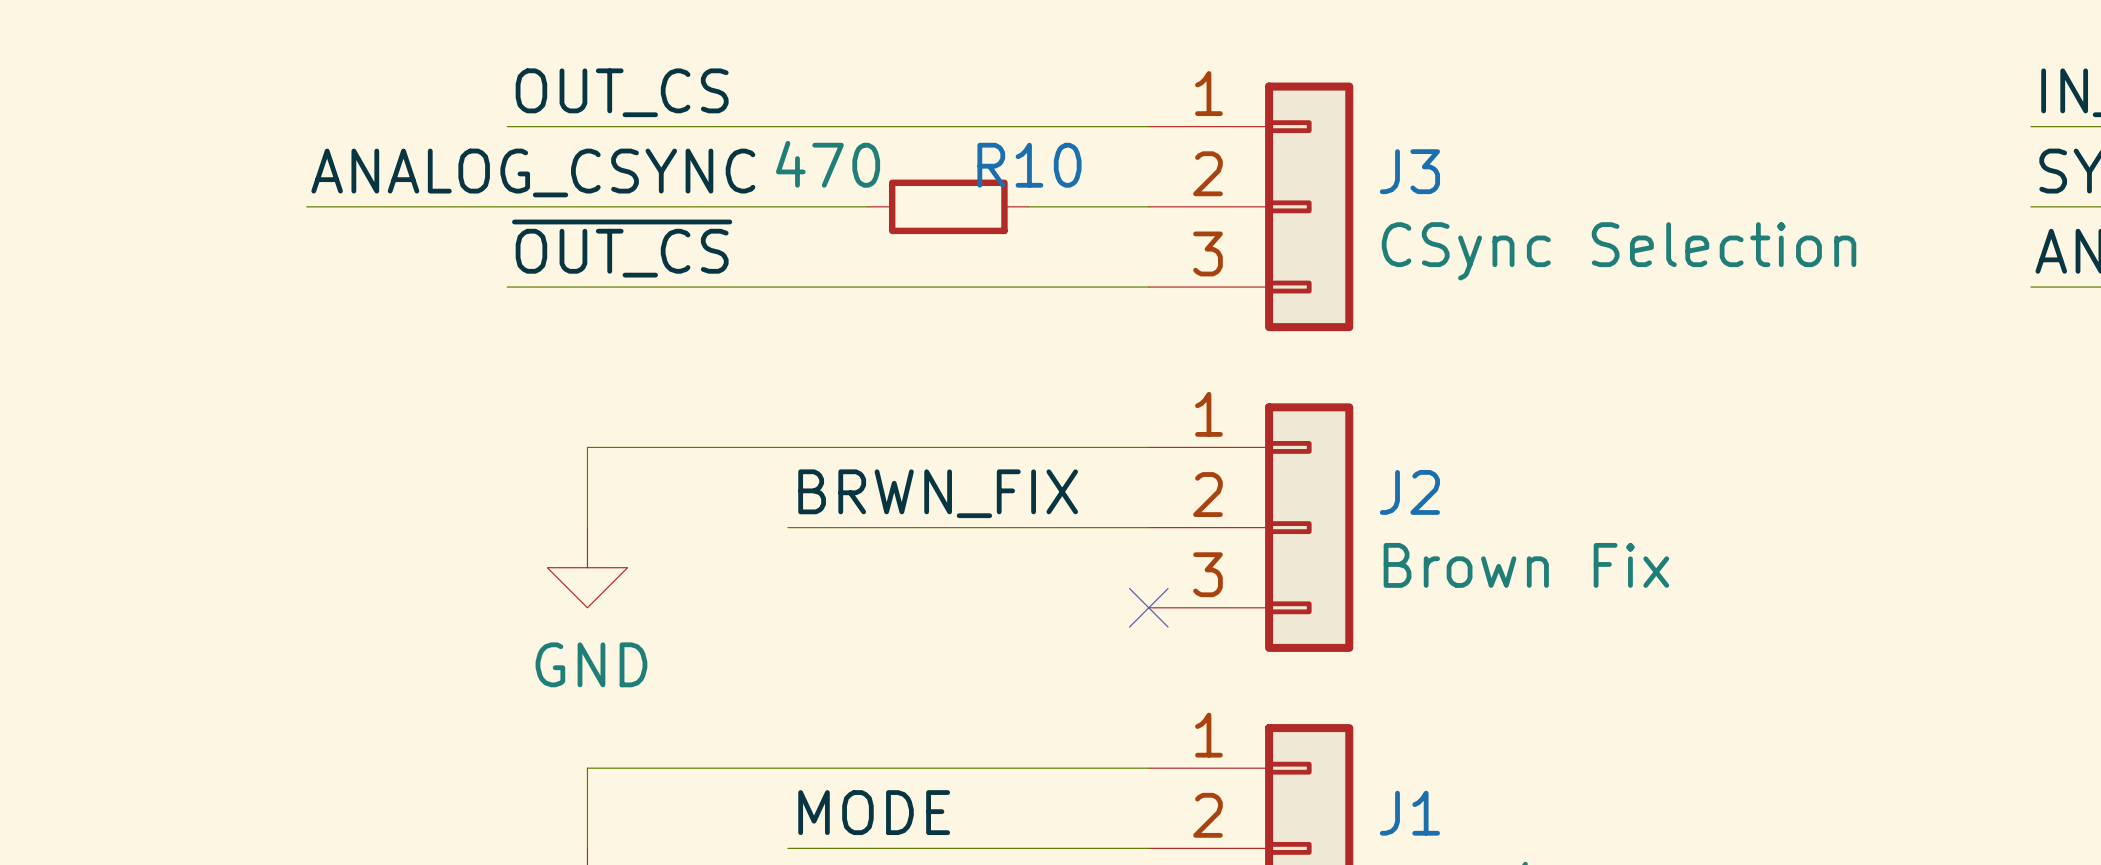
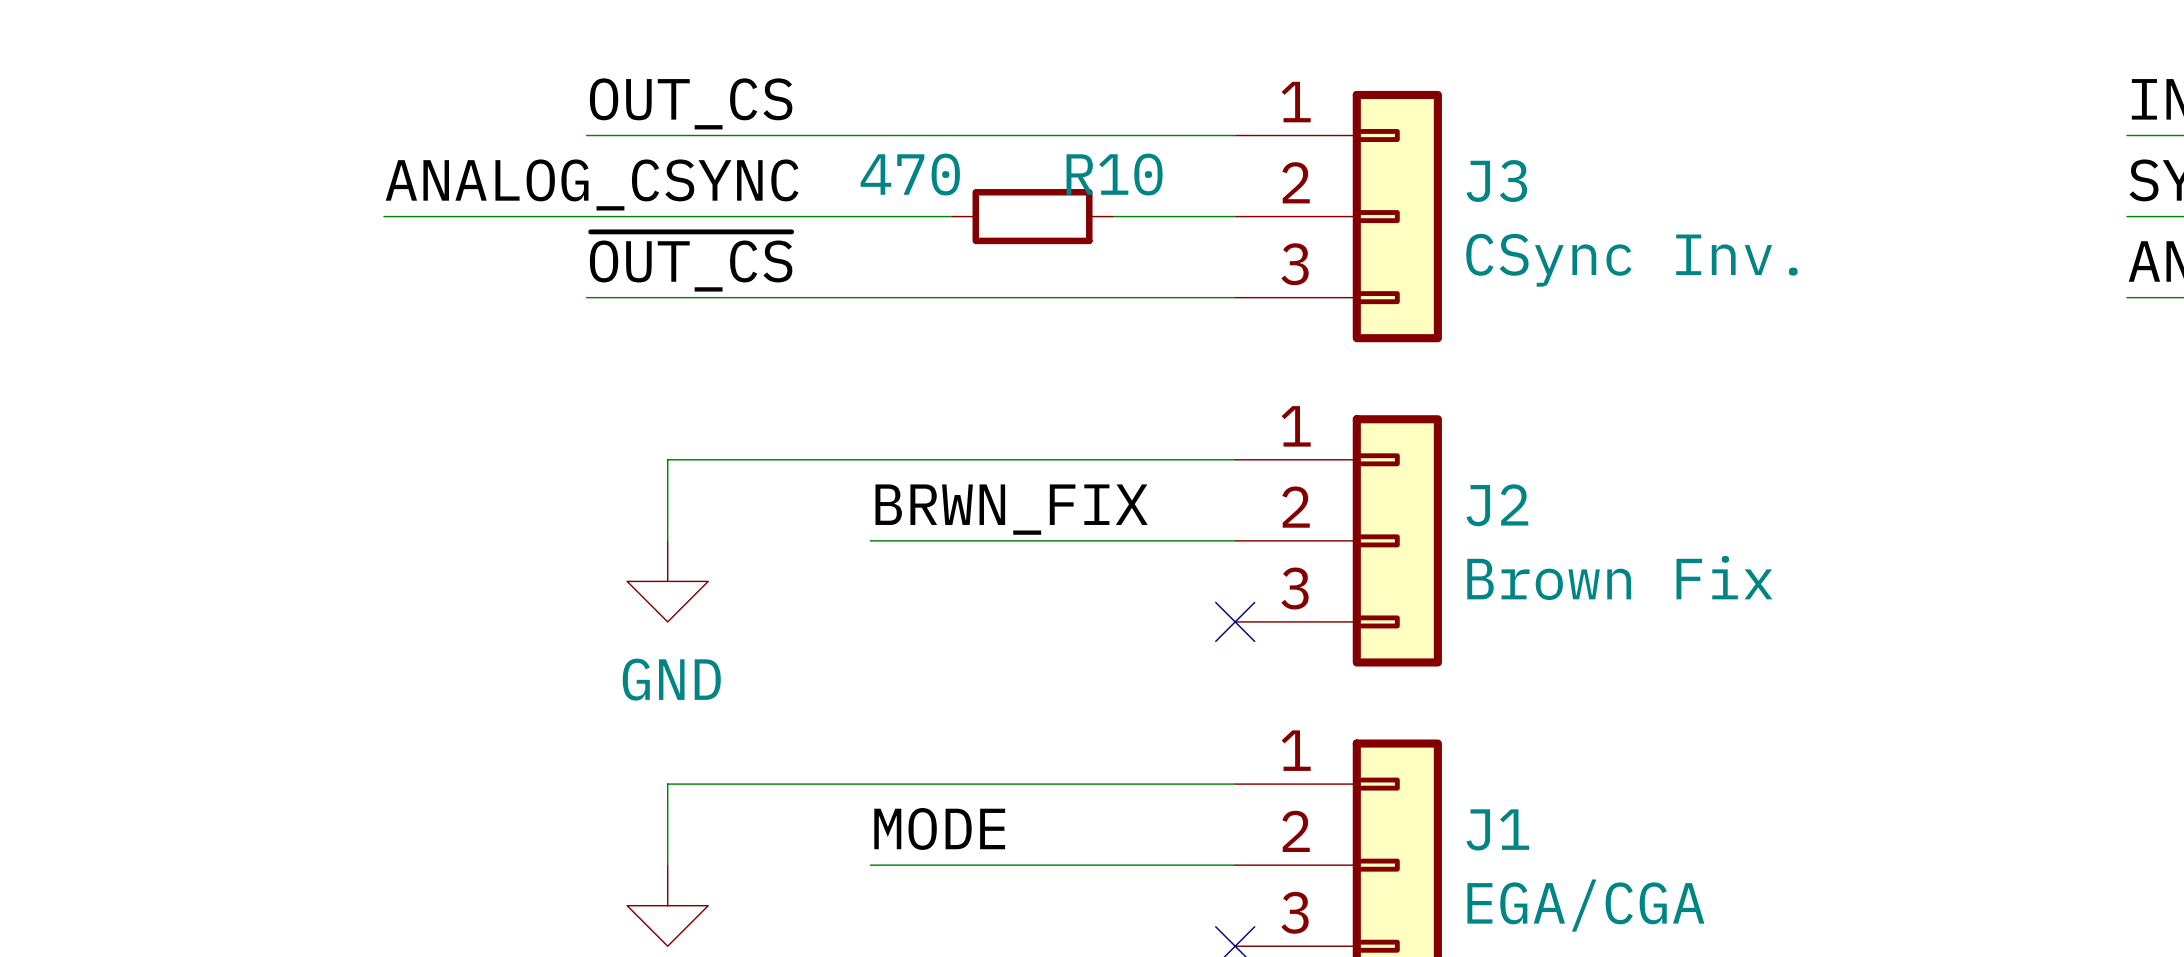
J3 value: CSync Selection (1618, 251) -> CSync Inv. (1631, 260)

